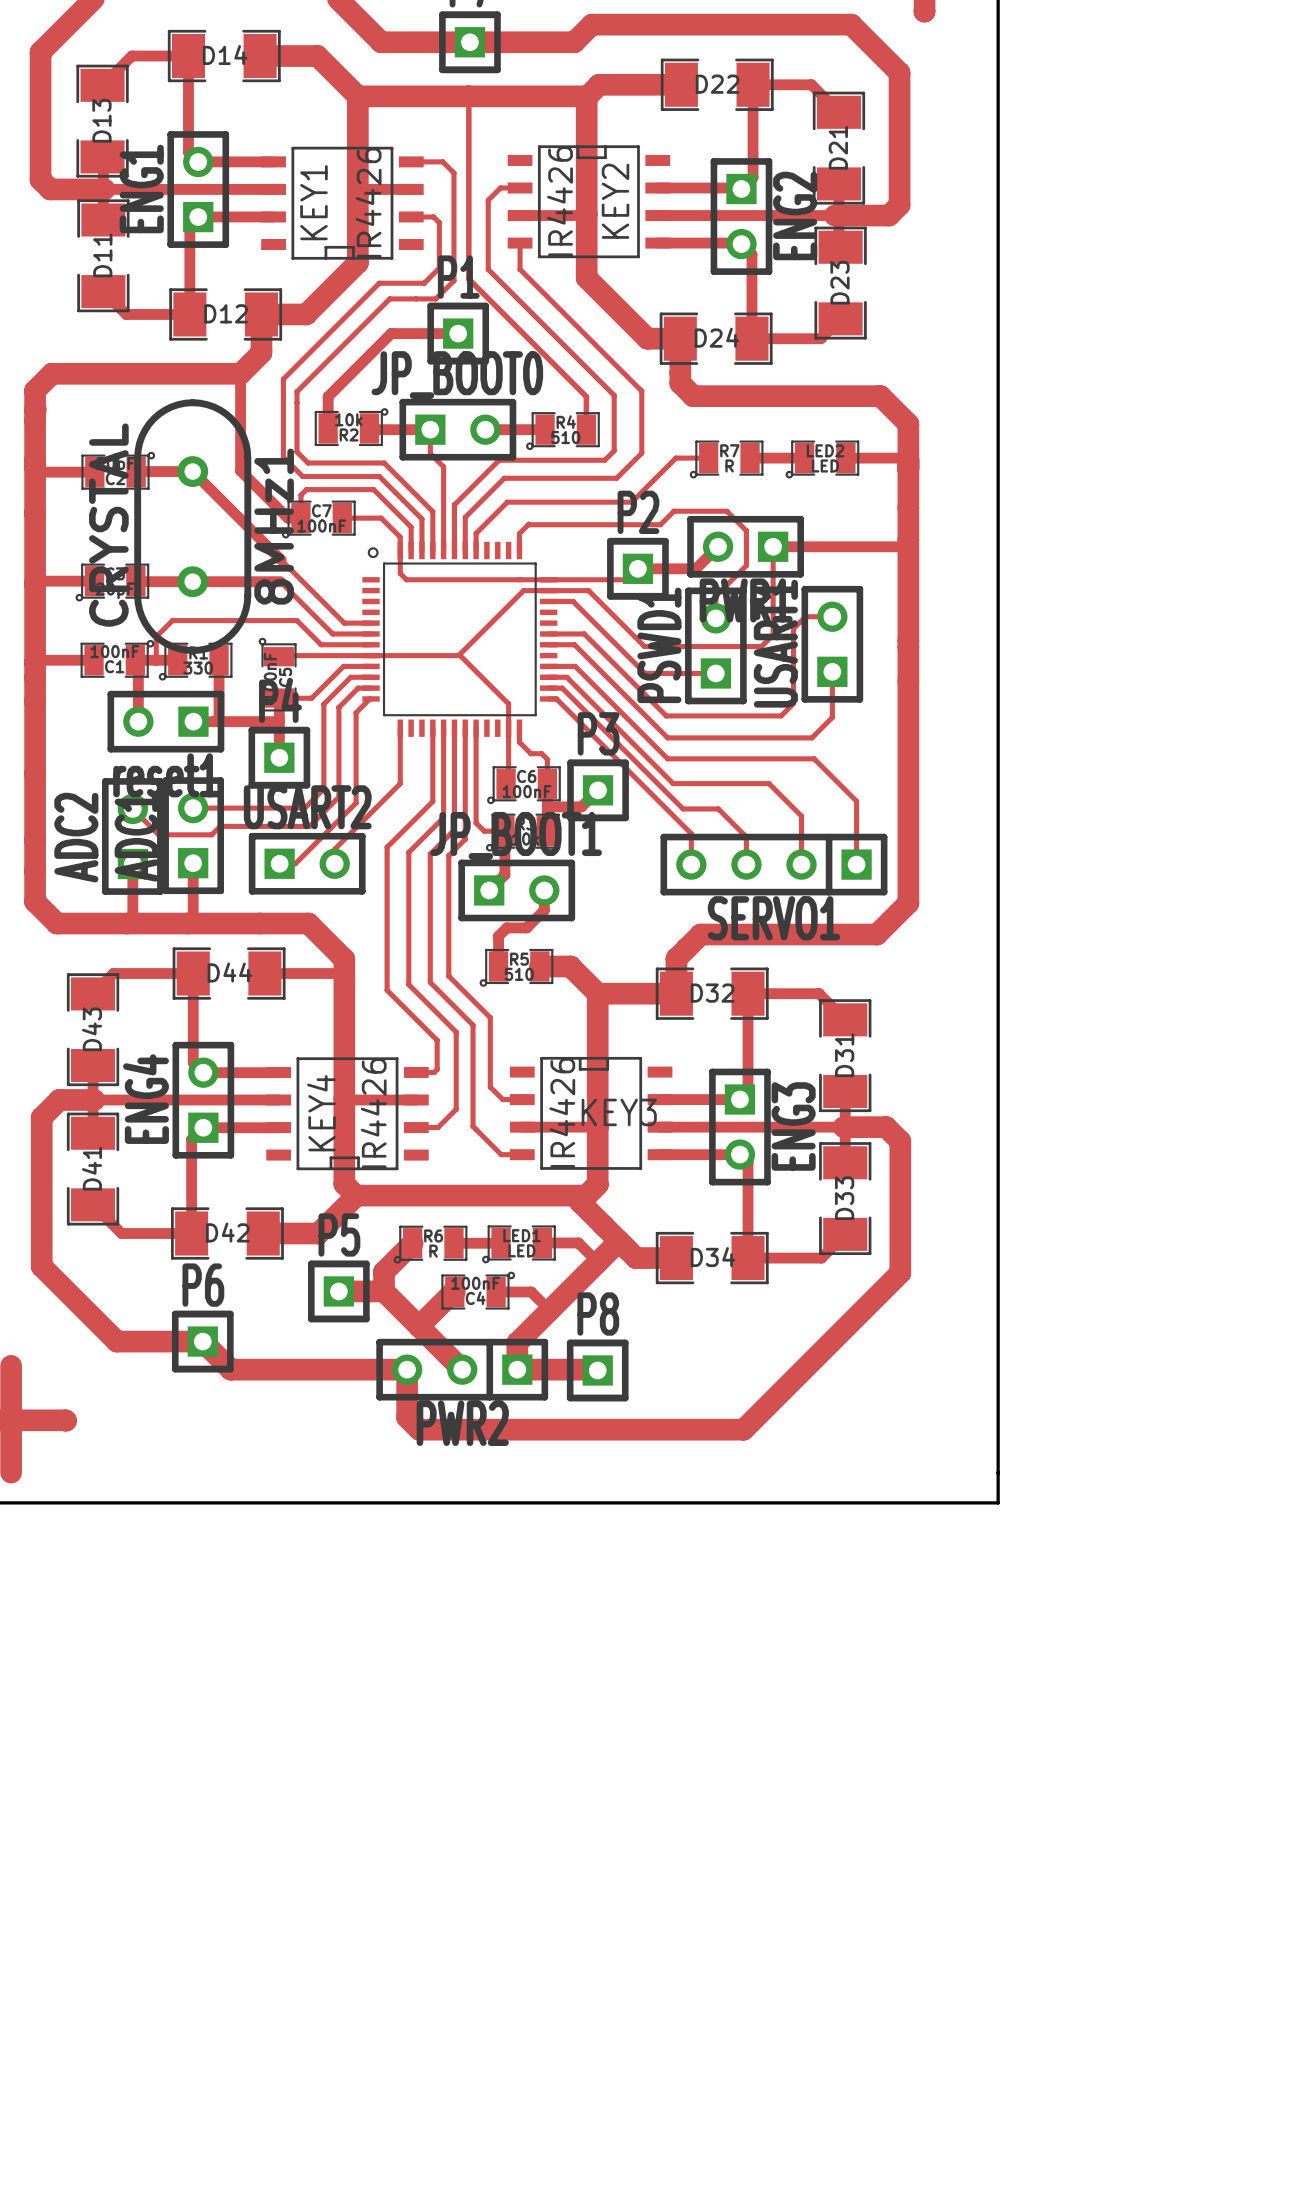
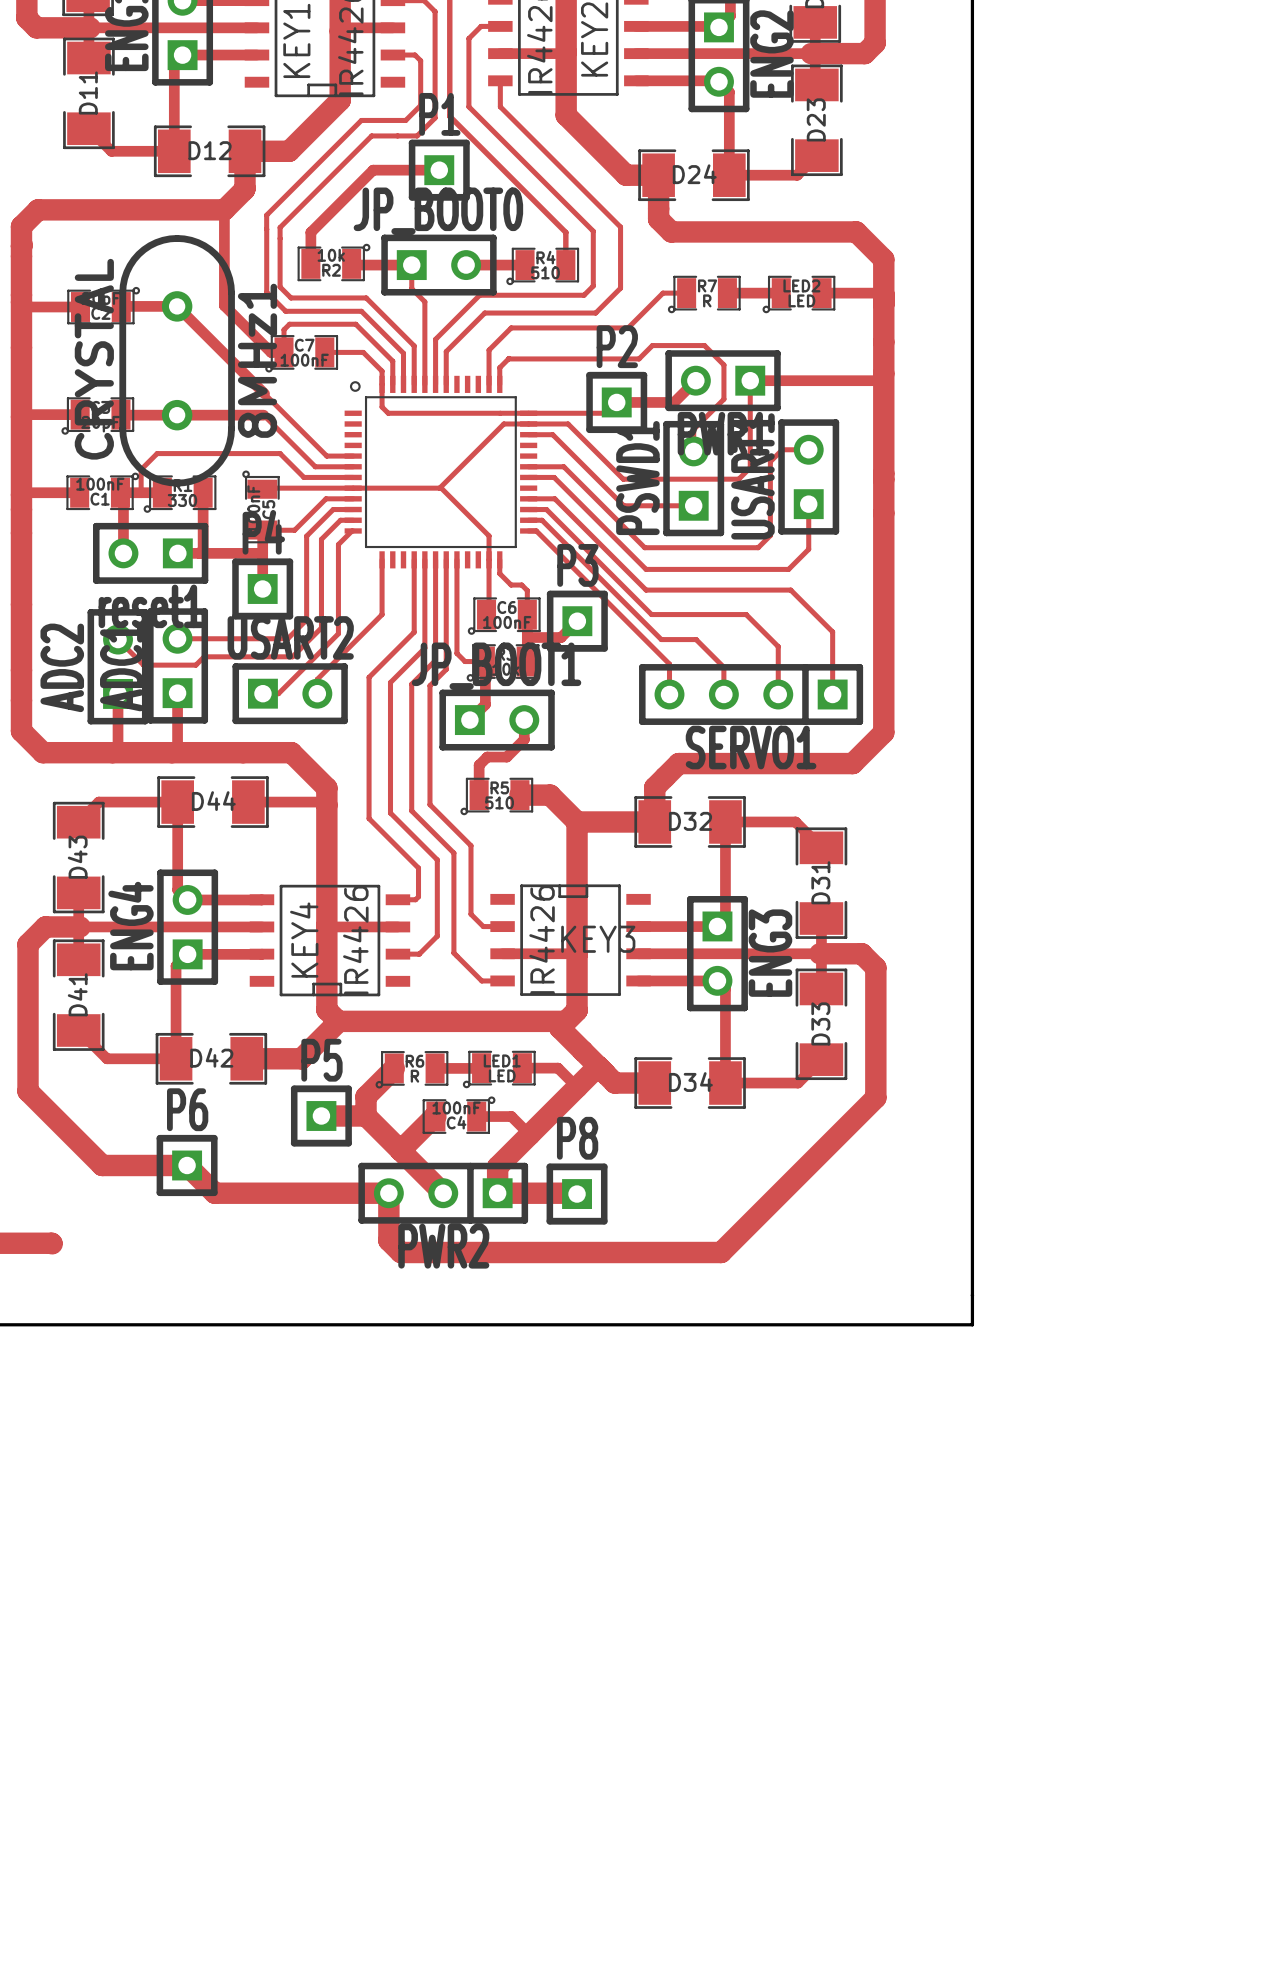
track: (684, 458) (675, 458) (631, 502) (507, 502) (476, 533) (476, 550) -> (662, 293) (628, 327) (511, 327) (489, 350) (489, 384)

